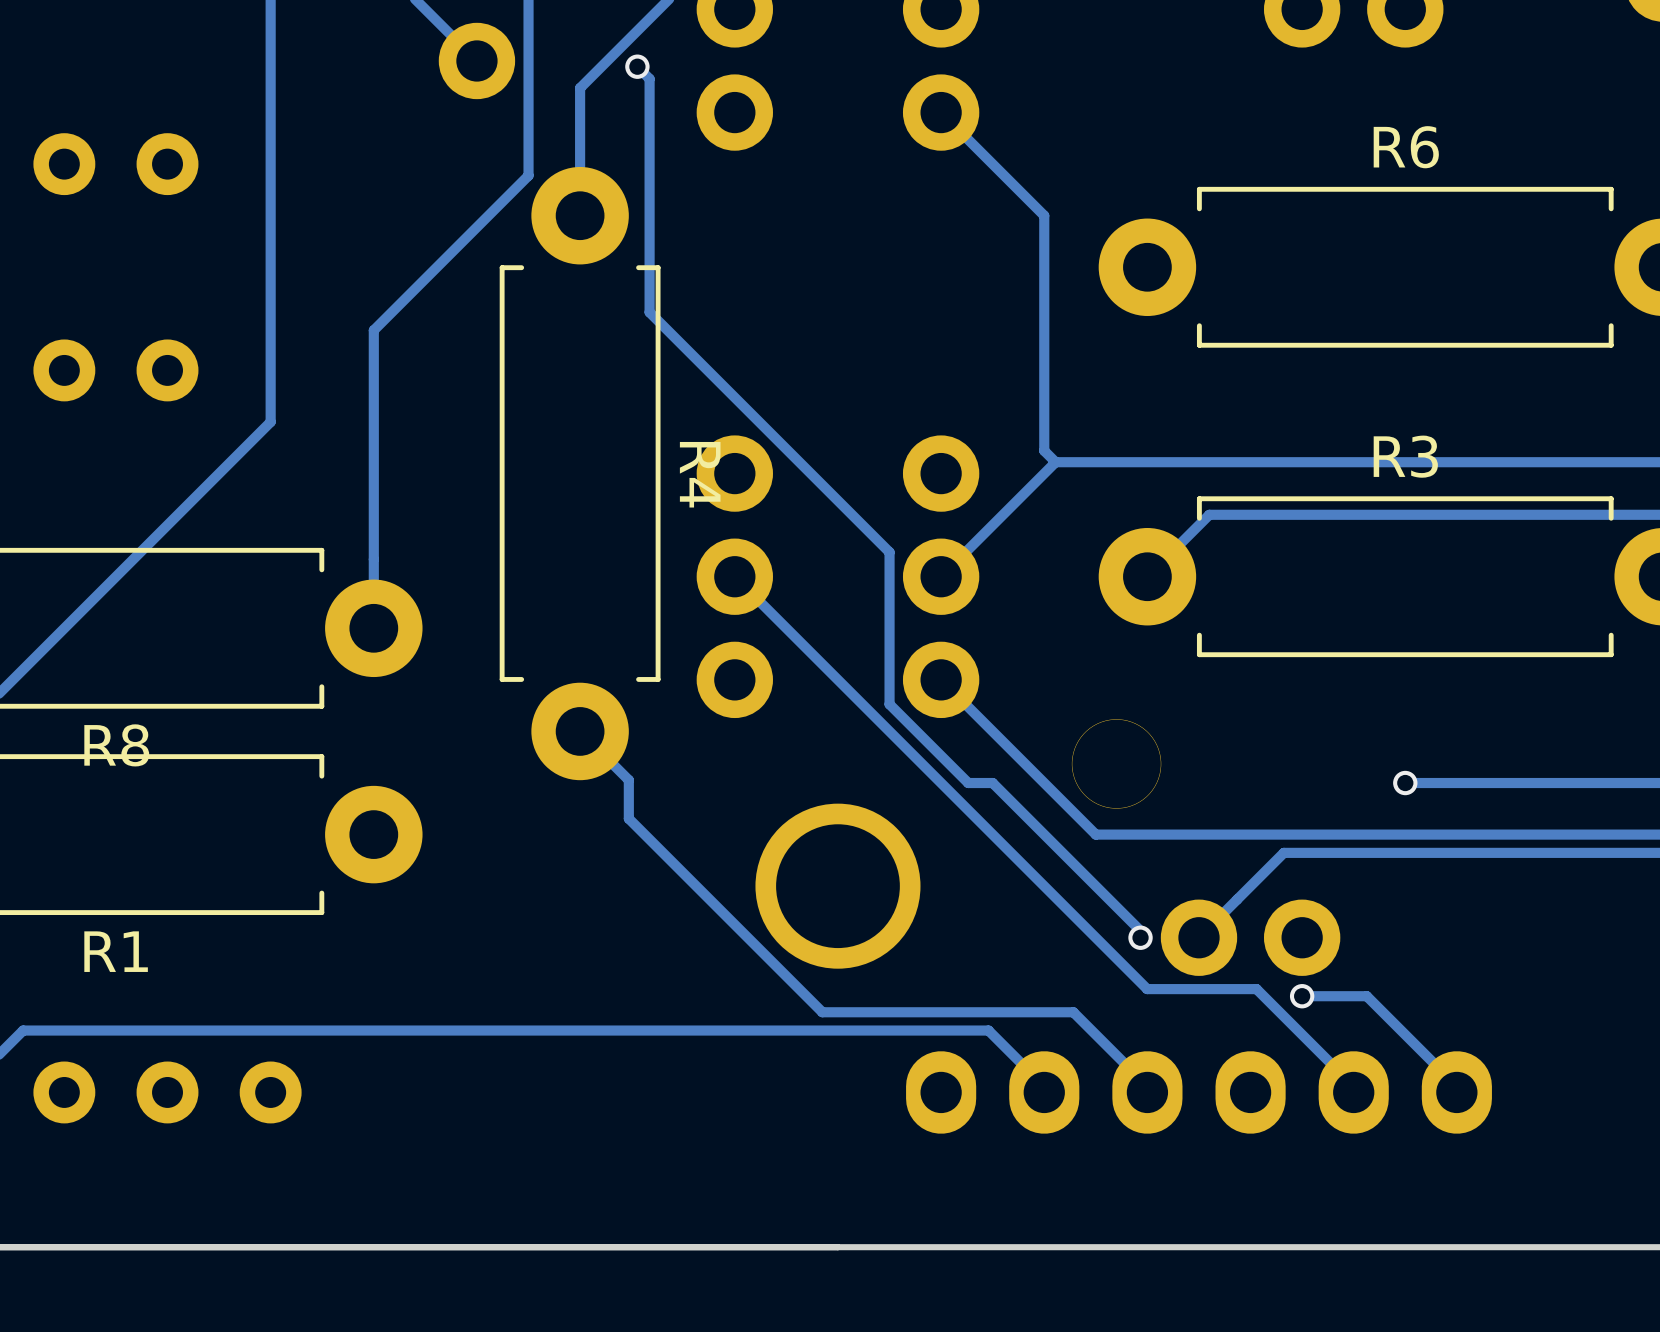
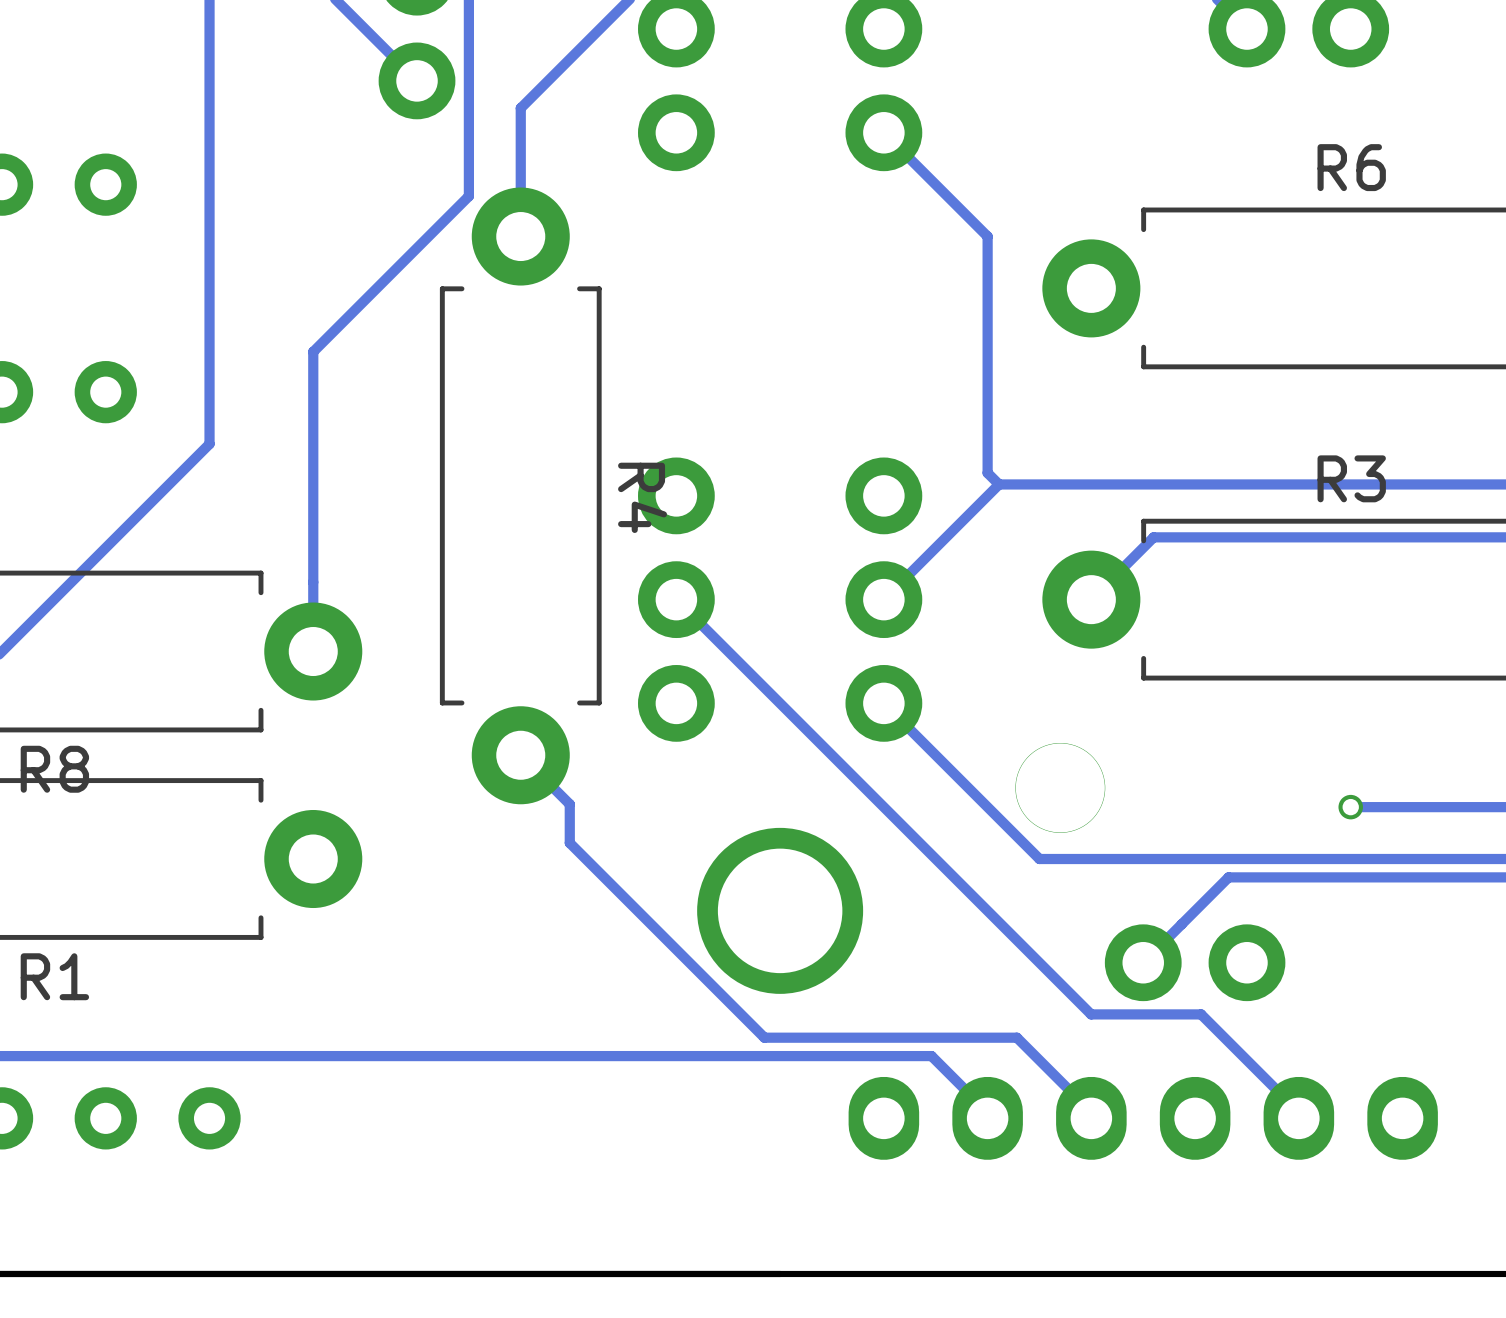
track: (637, 66) (649, 78) (649, 312) (889, 552) (889, 704) (968, 783) (992, 783) (1140, 930) (1140, 937) -> none
via: (637, 66) -> none
via: (1140, 937) -> none
track: (1302, 996) (1366, 996) (1456, 1086) (1456, 1092) -> none
via: (1302, 996) -> none

